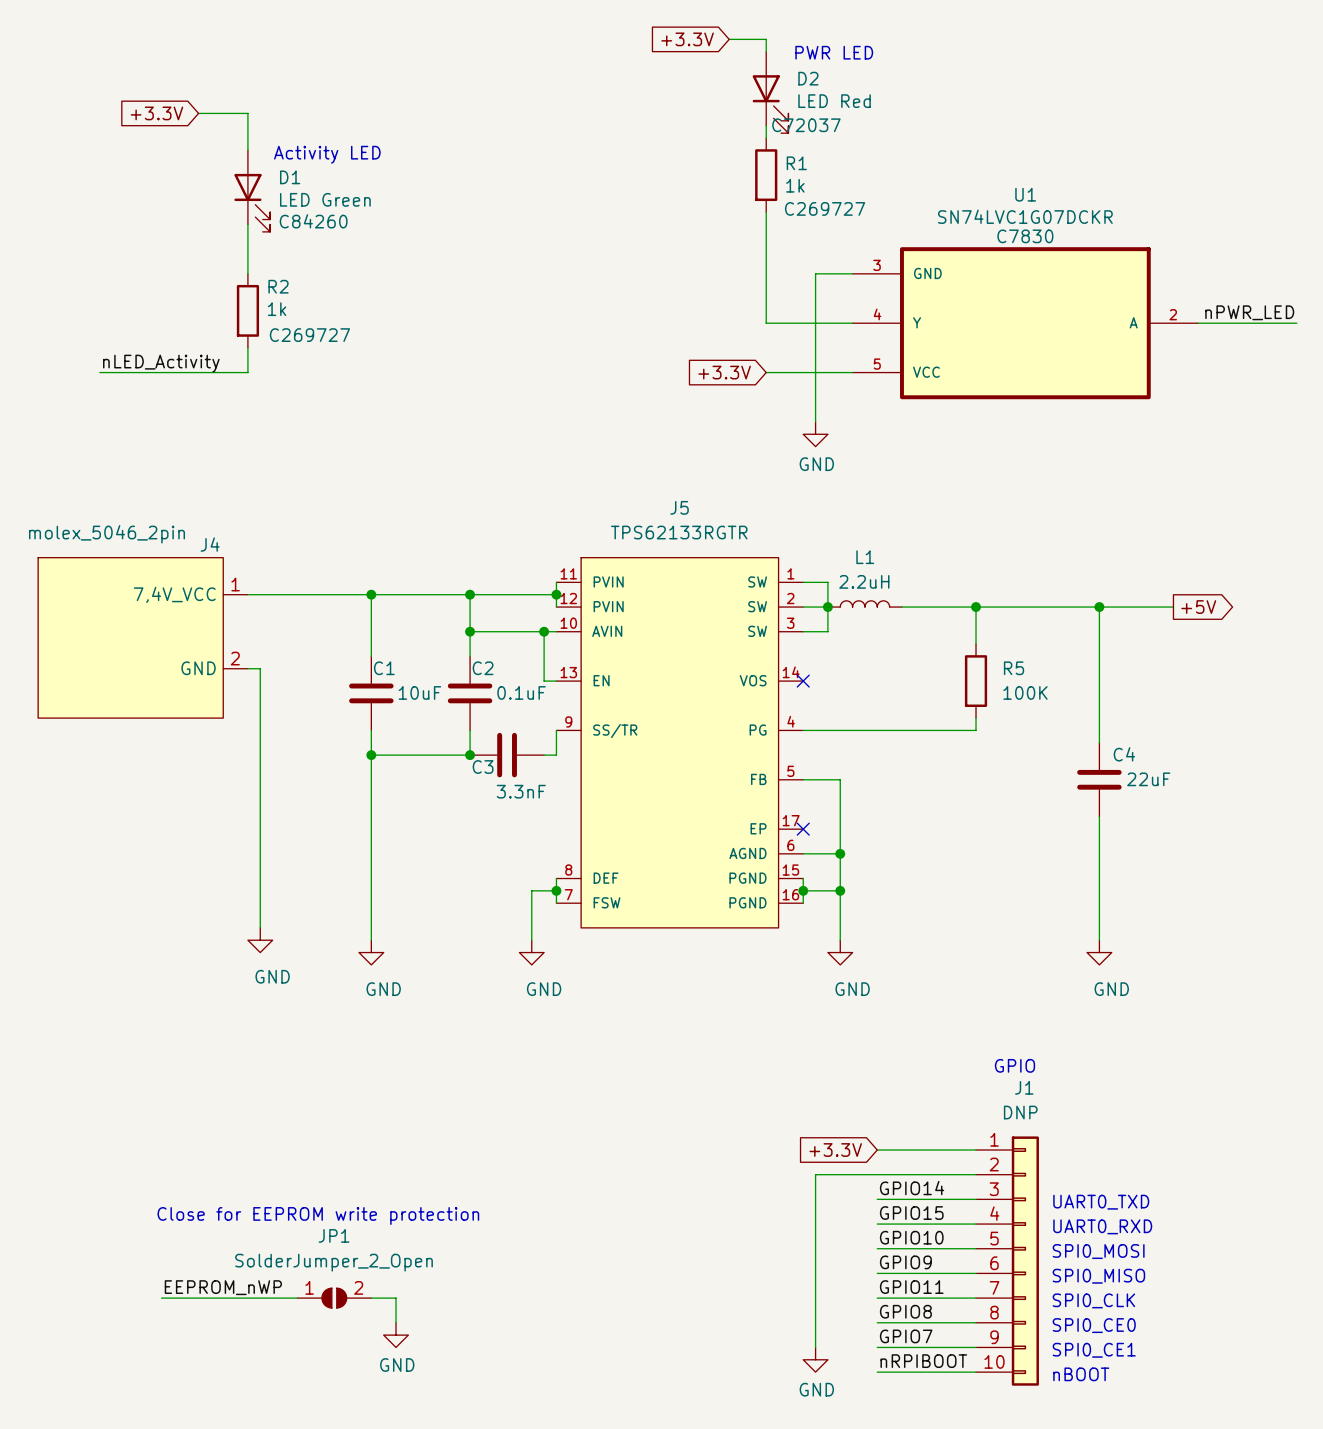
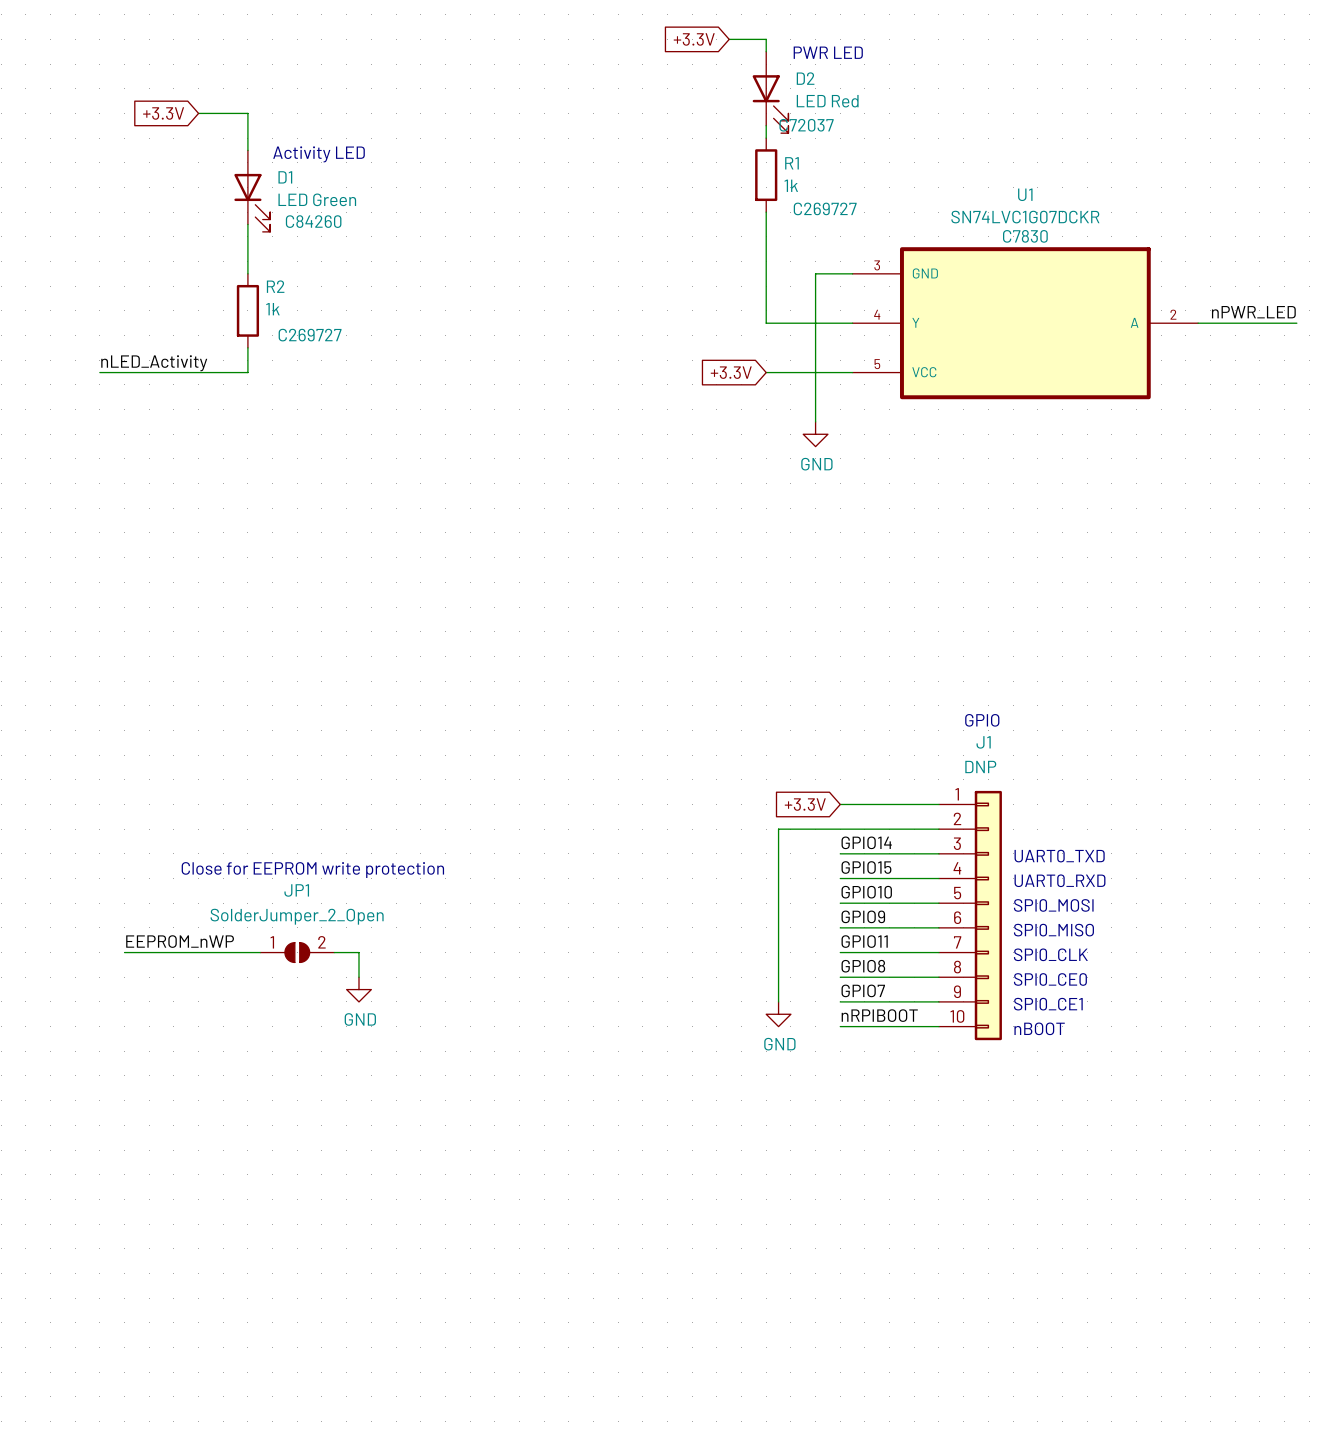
wire: (556, 582) (556, 607) -> none
wire: (803, 582) (827, 582) (827, 631) (803, 631) -> none
wire: (247, 594) (556, 594) -> none
wire: (371, 594) (371, 656) -> none
junction: (371, 594) -> none
wire: (470, 594) (470, 656) -> none
junction: (470, 594) -> none
junction: (556, 594) -> none
L1: 2.2uH (864, 603) -> none
wire: (803, 607) (827, 607) -> none
junction: (827, 607) -> none
wire: (901, 607) (1173, 607) -> none
wire: (976, 607) (976, 644) -> none
junction: (976, 607) -> none
wire: (1099, 607) (1099, 742) -> none
junction: (1099, 607) -> none
global label: +5V (1198, 607) -> none
wire: (470, 631) (556, 631) -> none
junction: (470, 631) -> none
wire: (544, 631) (544, 681) (556, 681) -> none
junction: (544, 631) -> none
J4: molex_5046_2pin (143, 637) -> none
wire: (247, 668) (260, 668) (260, 927) -> none
no-connect mark: (803, 681) -> none
R5: 100K (976, 681) -> none
C1: 10uF (371, 693) -> none
C2: 0.1uF (470, 693) -> none
wire: (976, 718) (976, 730) (803, 730) -> none
text: none -> GPIO (982, 720)
wire: (371, 730) (371, 940) -> none
wire: (470, 730) (470, 755) (371, 755) -> none
wire: (556, 730) (556, 755) (544, 755) -> none
J5: TPS62133RGTR (679, 742) -> none
junction: (371, 755) -> none
junction: (470, 755) -> none
C3: 3.3nF (507, 755) -> none
wire: (803, 779) (840, 779) (840, 940) -> none
C4: 22uF (1099, 779) -> none
global label: none -> +3.3V (805, 804)
wire: none -> (840, 804) (938, 804)
wire: (1099, 816) (1099, 940) -> none
no-connect mark: (803, 829) -> none
wire: none -> (938, 829) (778, 829) (778, 1001)
label: none -> GPIO14 (866, 842)
wire: (803, 853) (840, 853) -> (938, 853) (840, 853)
junction: (840, 853) -> none
text: none -> UART0_TXD (1059, 856)
label: none -> GPIO15 (866, 867)
text: none -> Close for EEPROM write protection (312, 870)
wire: (556, 878) (556, 903) -> none
wire: (803, 878) (803, 903) -> none
wire: none -> (840, 878) (938, 878)
text: none -> UART0_RXD (1059, 880)
wire: (556, 890) (531, 890) (531, 940) -> none
junction: (556, 890) -> none
wire: (803, 890) (840, 890) -> none
junction: (803, 890) -> none
junction: (840, 890) -> none
label: none -> GPIO10 (866, 892)
wire: none -> (840, 903) (938, 903)
text: none -> SPI0_MOSI (1053, 905)
label: none -> GPIO9 (863, 916)
text: none -> SPI0_MISO (1053, 930)
power symbol: GND (260, 940) -> none
label: none -> GPIO11 (864, 941)
label: none -> EEPROM_nWP (180, 941)
wire: none -> (124, 952) (260, 952)
wire: none -> (334, 952) (358, 952) (358, 977)
power symbol position: GND (371, 952) -> GND (358, 989)
power symbol: GND (531, 952) -> none
wire: none -> (840, 952) (938, 952)
power symbol position: GND (840, 952) -> GND (778, 1014)
power symbol: GND (1099, 952) -> none
text: none -> SPI0_CLK (1050, 954)
label: none -> GPIO8 (863, 966)
text: none -> SPI0_CE0 (1050, 979)
power symbol text position: GND (383, 989) -> GND (360, 1019)
power symbol text position: GND (852, 989) -> GND (779, 1044)
label: none -> GPIO7 (863, 990)
text: none -> SPI0_CE1 (1048, 1004)
label: none -> nRPIBOOT (879, 1015)
text: none -> nBOOT (1039, 1028)
text: GPIO (1014, 1065) -> none
global label: +3.3V (835, 1150) -> none
wire: (877, 1150) (976, 1150) -> (840, 927) (938, 927)
wire: (976, 1174) (815, 1174) (815, 1347) -> none
label: GPIO14 (912, 1188) -> none
wire: (877, 1199) (976, 1199) -> (840, 977) (938, 977)
text: UART0_TXD (1101, 1202) -> none
label: GPIO15 (911, 1213) -> none
text: Close for EEPROM write protection (318, 1215) -> none
wire: (877, 1224) (976, 1224) -> (840, 1001) (938, 1001)
text: UART0_RXD (1102, 1226) -> none
label: GPIO10 (911, 1237) -> none
wire: (877, 1248) (976, 1248) -> (840, 1026) (938, 1026)
text: SPI0_MOSI (1098, 1251) -> none
J1 position: (1007, 1261) -> (970, 915)
label: GPIO9 (905, 1262) -> none
wire: (877, 1273) (976, 1273) -> none
text: SPI0_MISO (1098, 1276) -> none
label: EEPROM_nWP (223, 1287) -> none
label: GPIO11 (911, 1287) -> none
wire: (161, 1298) (297, 1298) -> none
JP1 position: (334, 1298) -> (297, 952)
wire: (371, 1298) (396, 1298) (396, 1322) -> none
wire: (877, 1298) (976, 1298) -> none
text: SPI0_CLK (1093, 1300) -> none
label: GPIO8 (905, 1311) -> none
wire: (877, 1322) (976, 1322) -> none
text: SPI0_CE0 (1094, 1325) -> none
power symbol: GND (396, 1335) -> none
label: GPIO7 (906, 1336) -> none
wire: (877, 1347) (976, 1347) -> none
text: SPI0_CE1 (1094, 1350) -> none
power symbol: GND (815, 1359) -> none
label: nRPIBOOT (923, 1361) -> none
wire: (877, 1372) (976, 1372) -> none
text: nBOOT (1081, 1374) -> none

